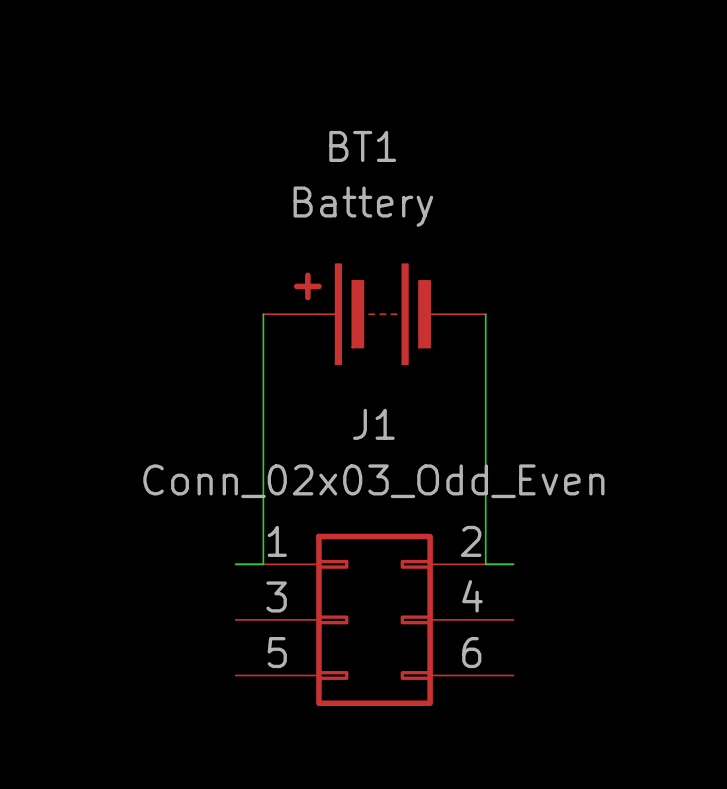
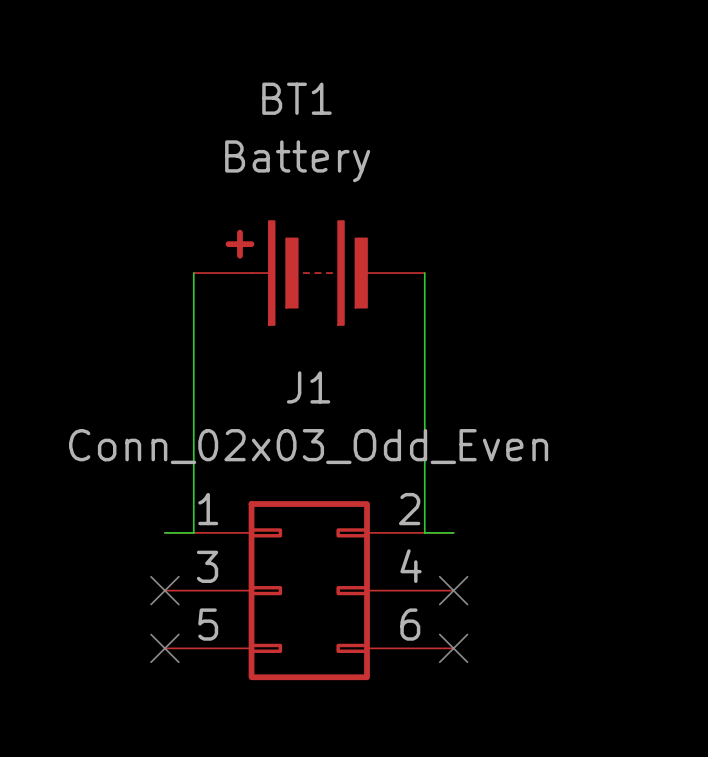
no-connect mark: none -> (164, 590)
no-connect mark: none -> (453, 590)
no-connect mark: none -> (164, 648)
no-connect mark: none -> (453, 648)

